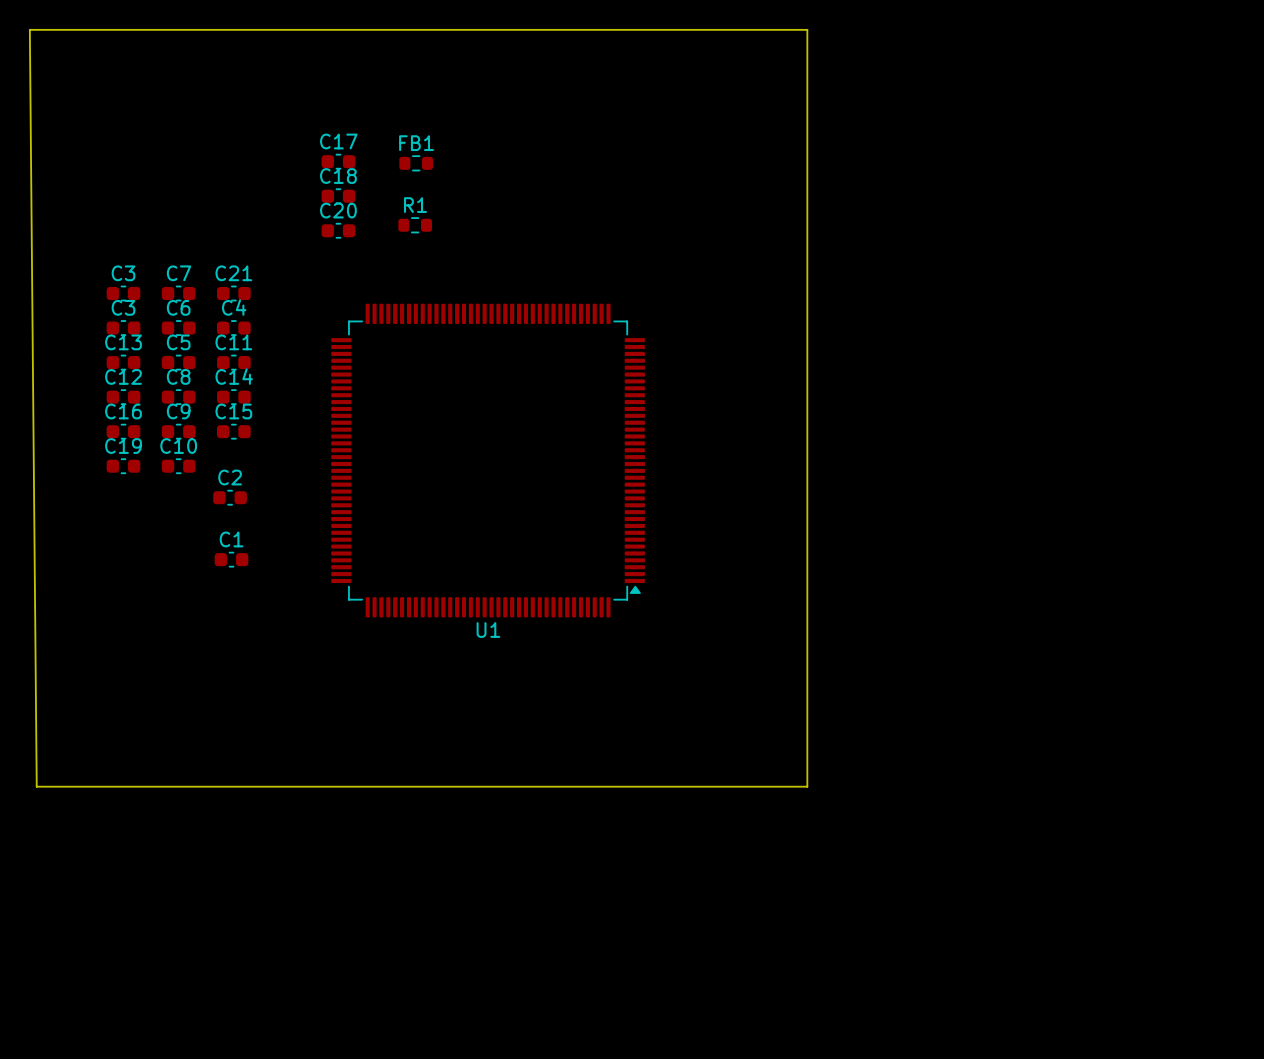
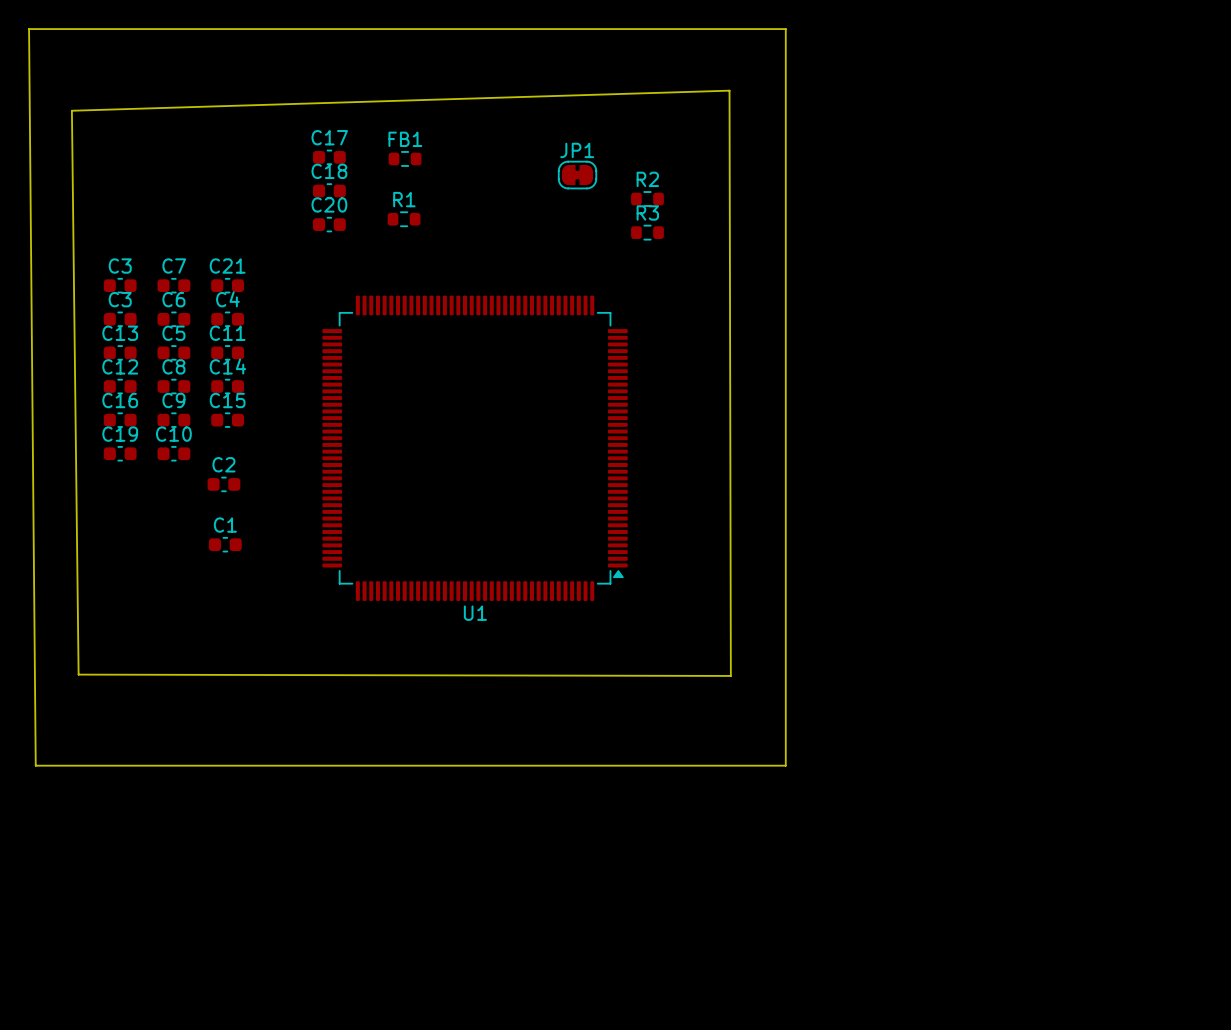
board edge: none -> (729, 90) (71, 110) (78, 674) (730, 675) (729, 90)
JP1: none -> (577, 175)
R2: none -> (647, 199)
R3: none -> (647, 232)

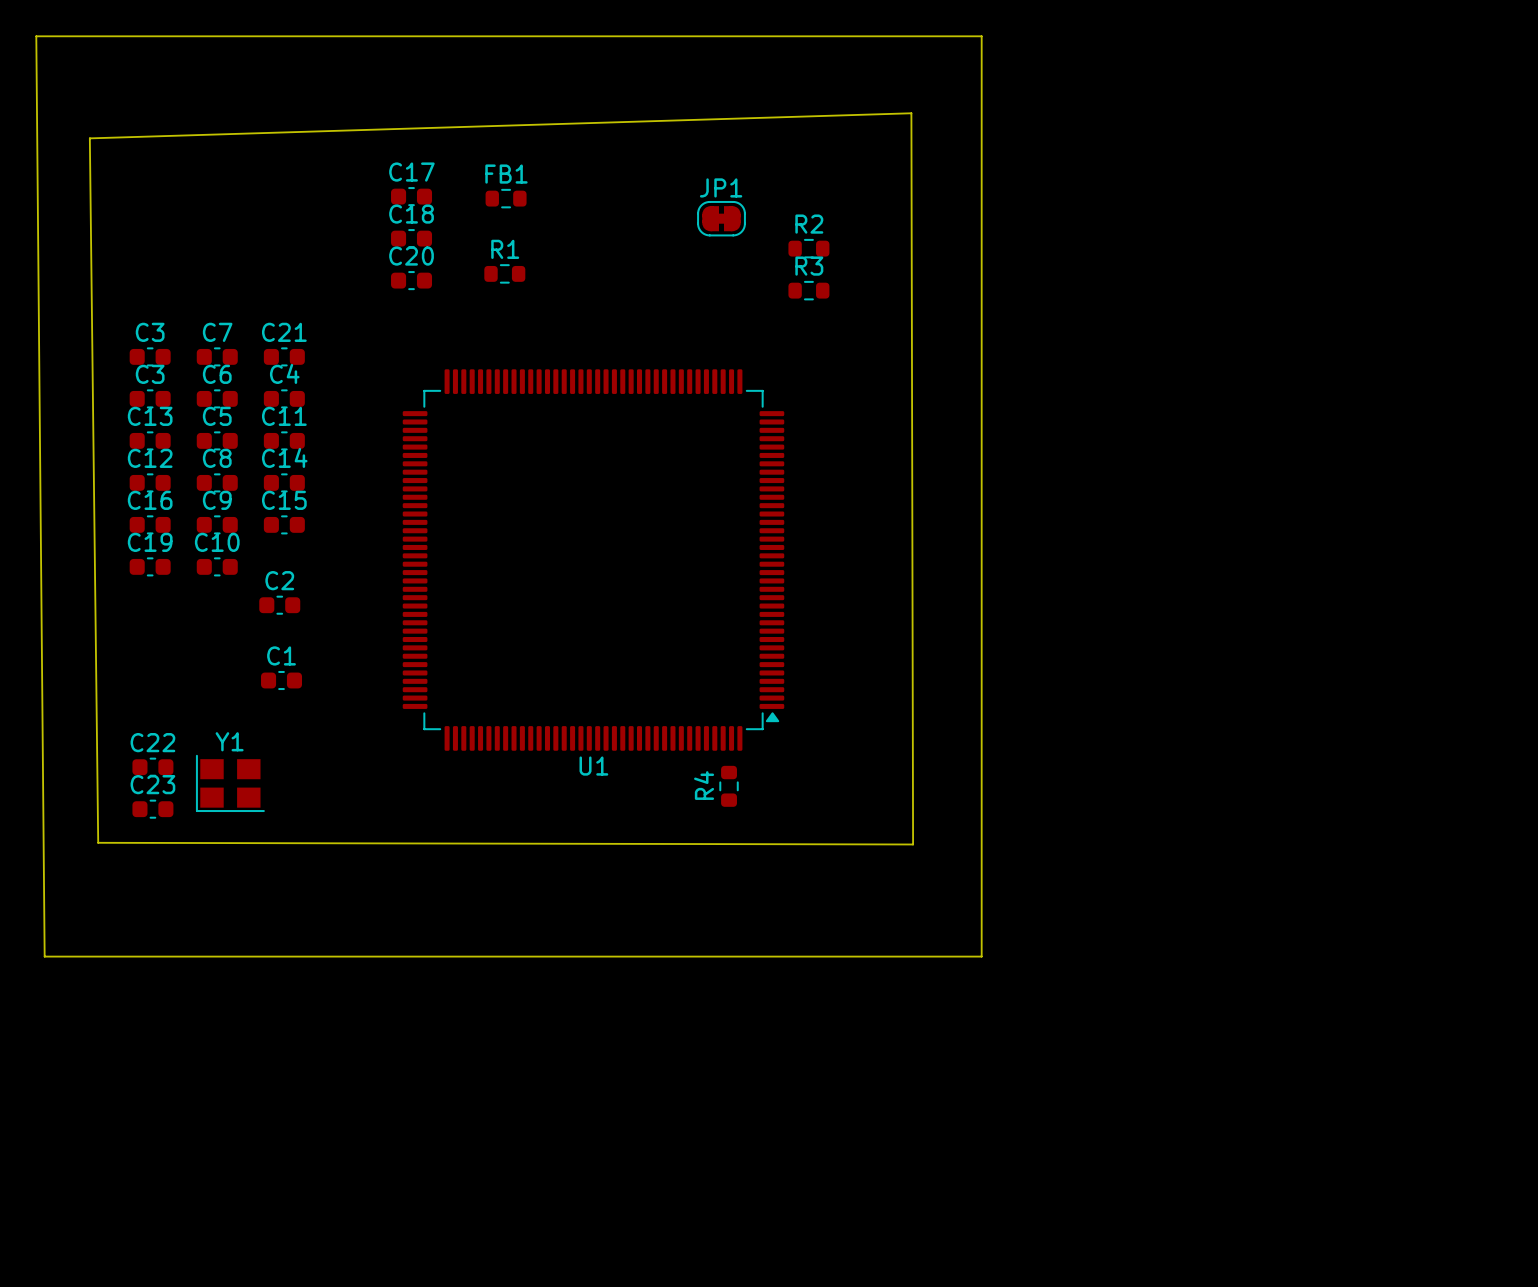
C22: none -> (152, 767)
Y1: none -> (230, 783)
R4: none -> (729, 786)
C23: none -> (152, 809)

